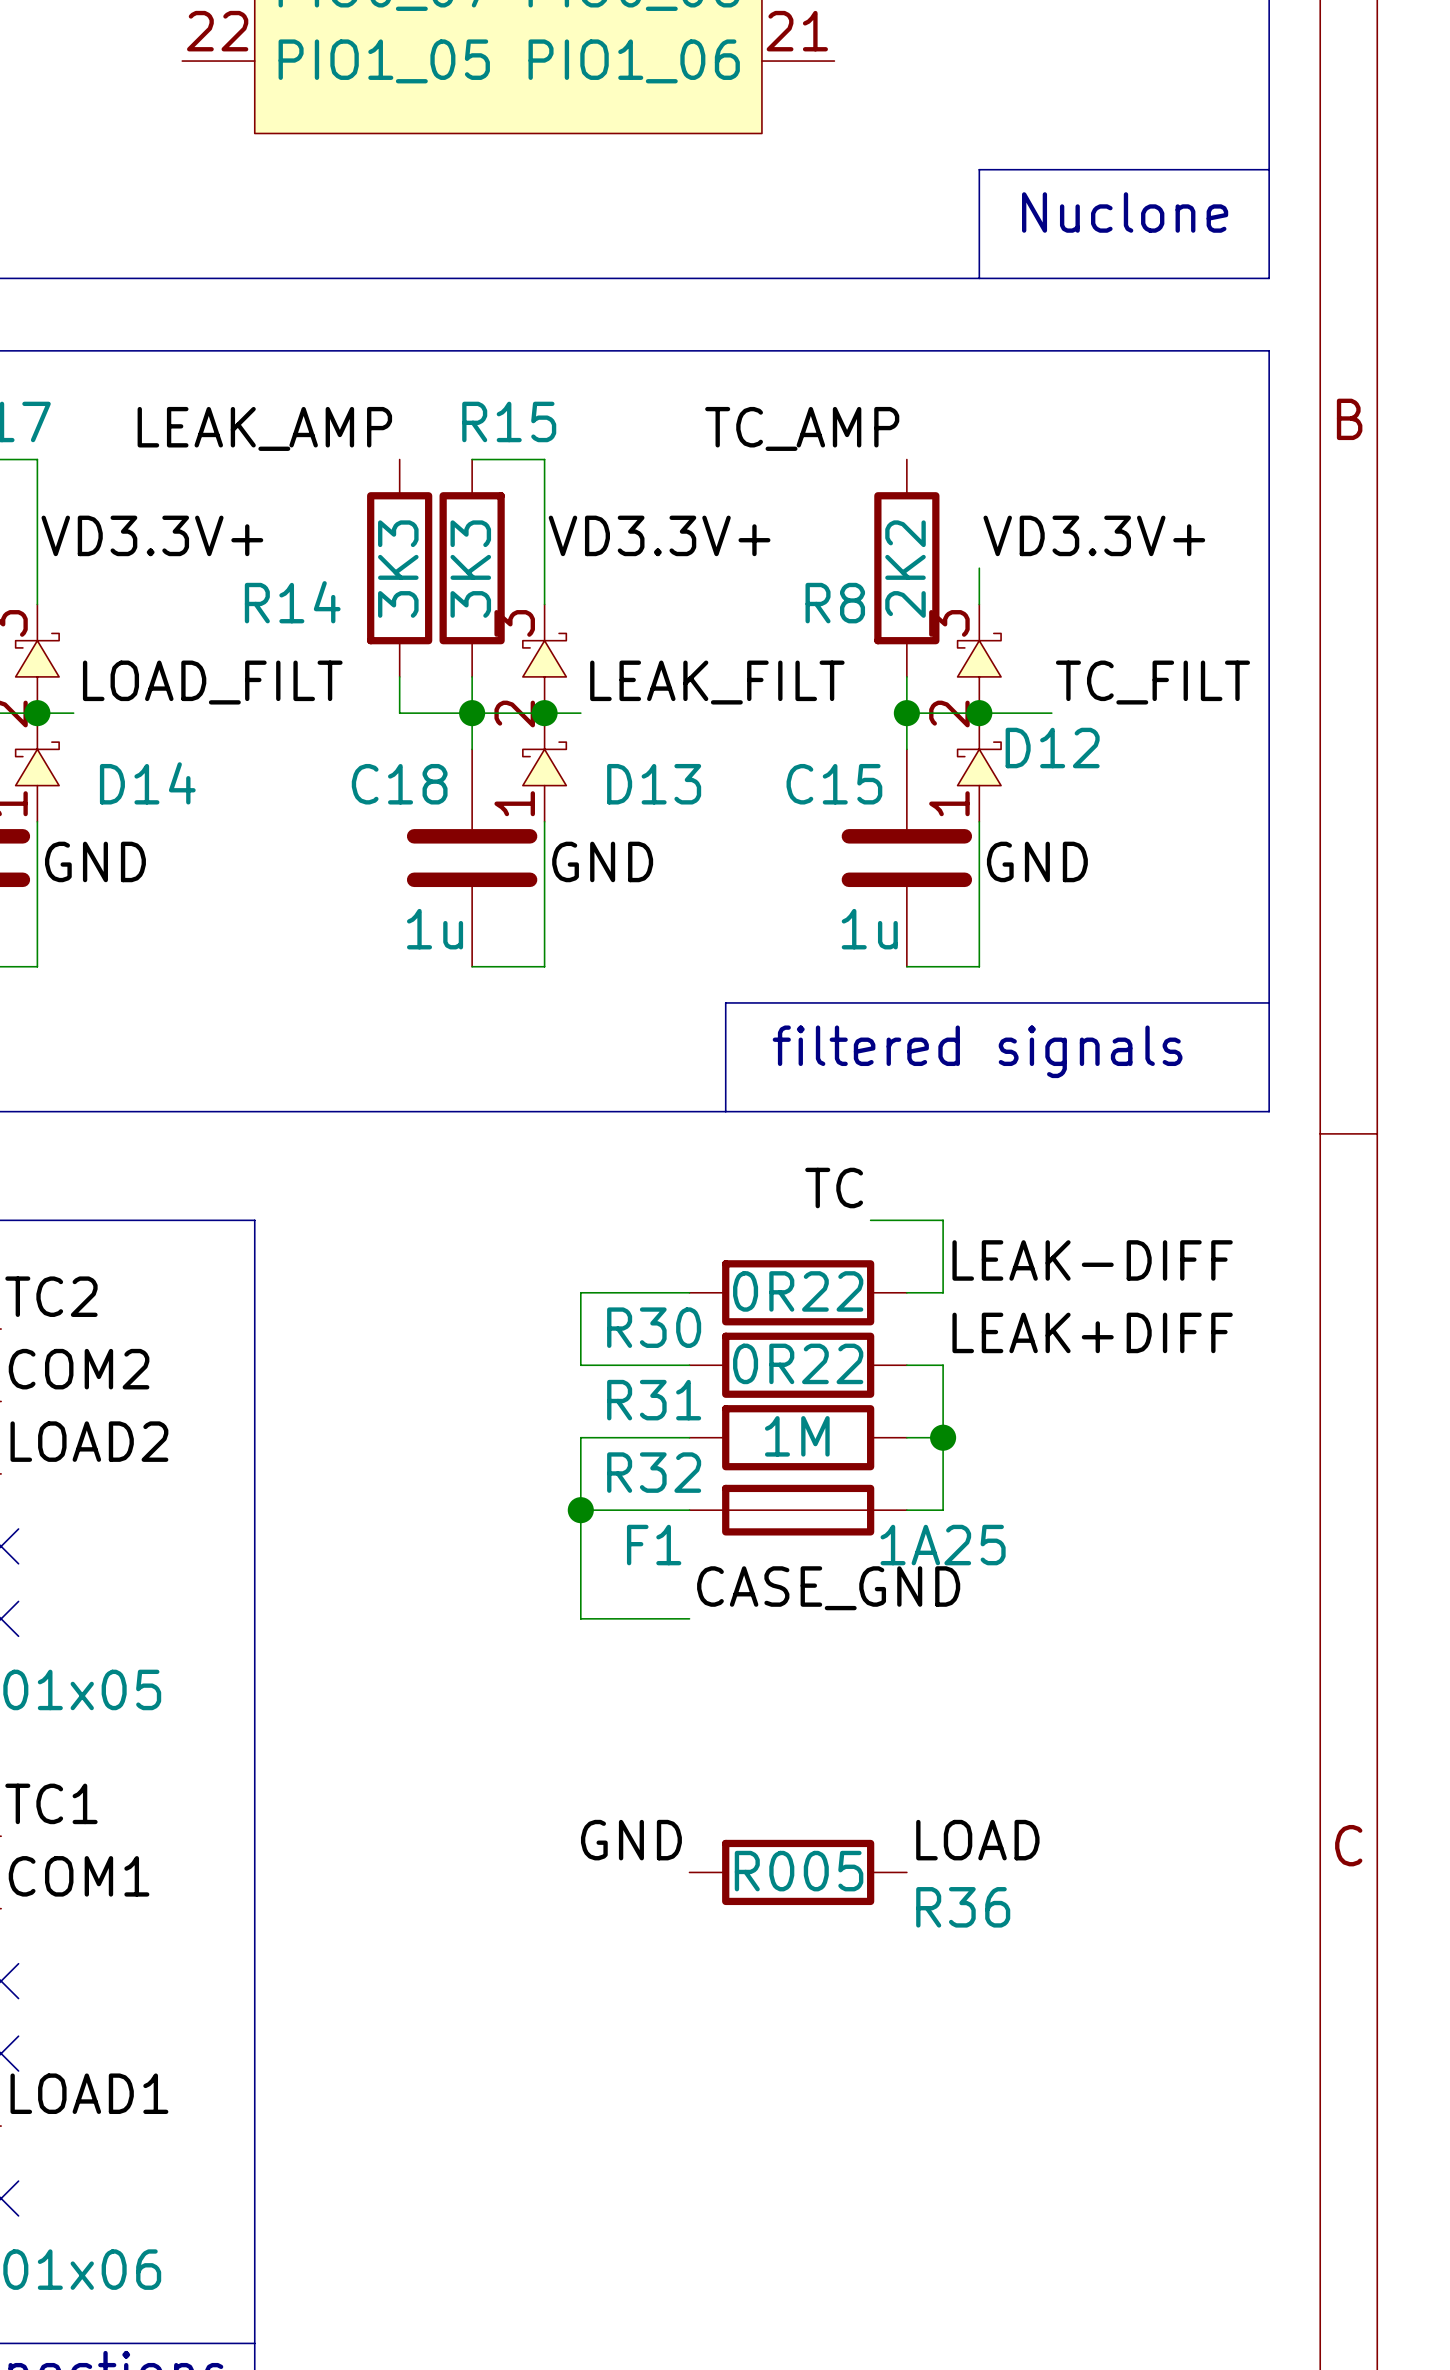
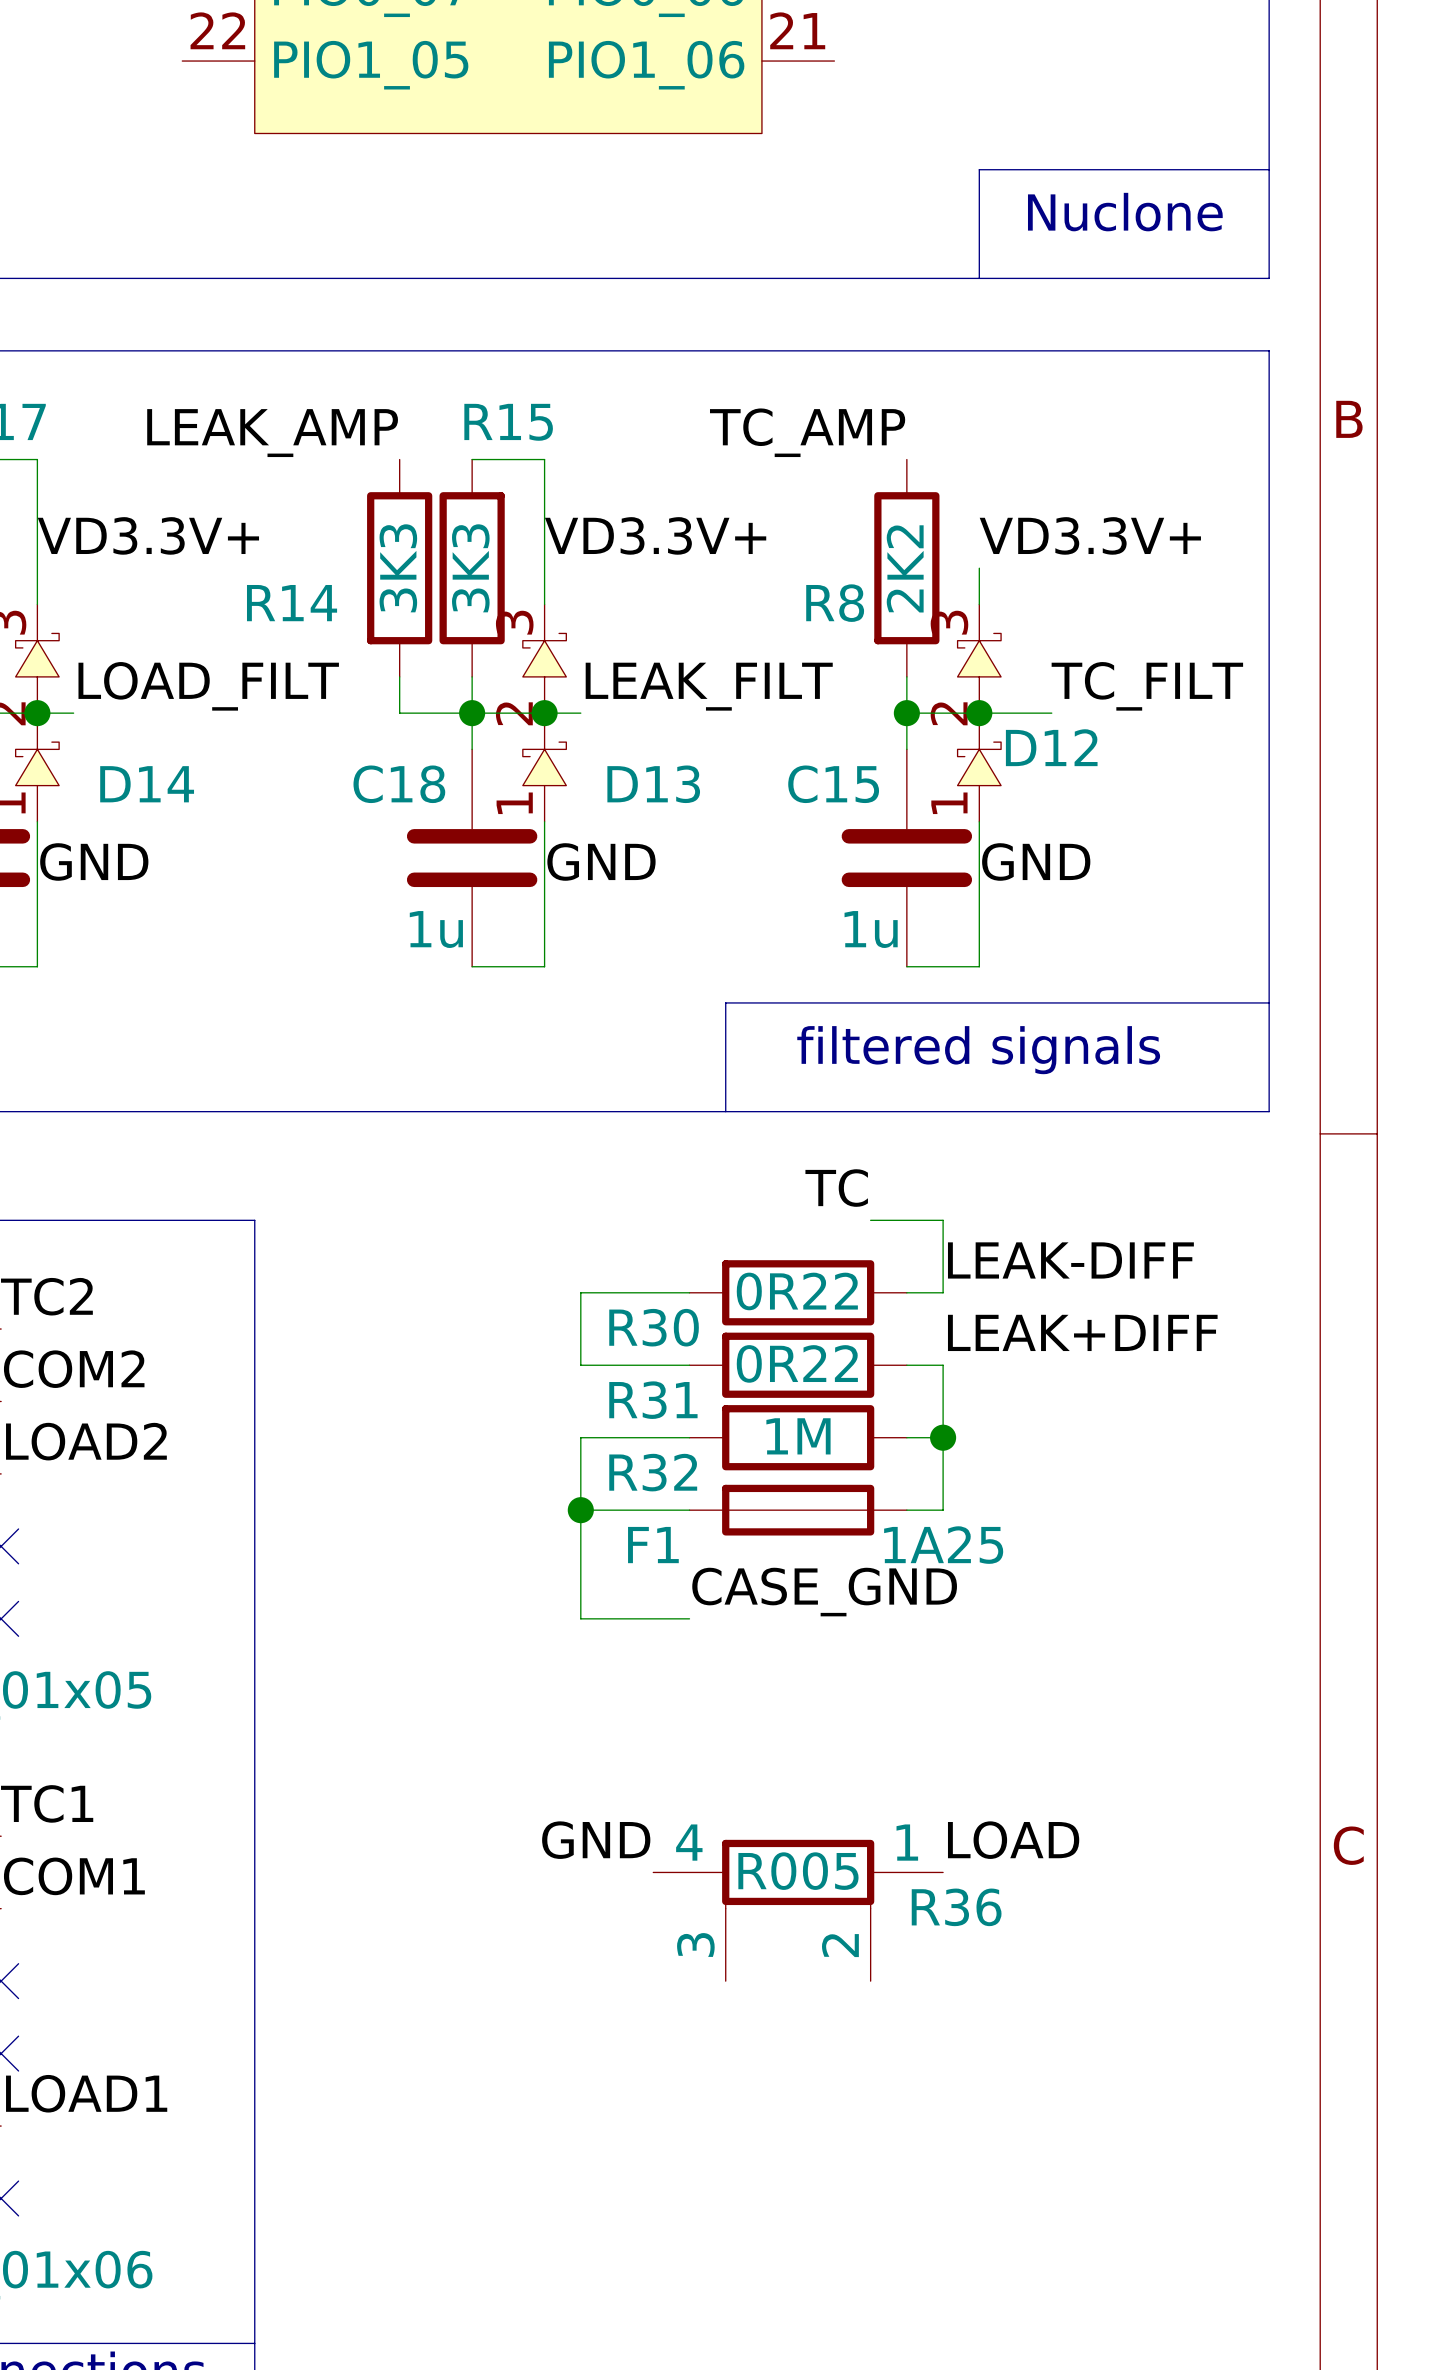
R36 symbol: [689, 1839, 907, 1906] -> [653, 1839, 944, 1982]
label position: GND (631, 1840) -> GND (596, 1840)
label position: LOAD (977, 1840) -> LOAD (1013, 1840)

